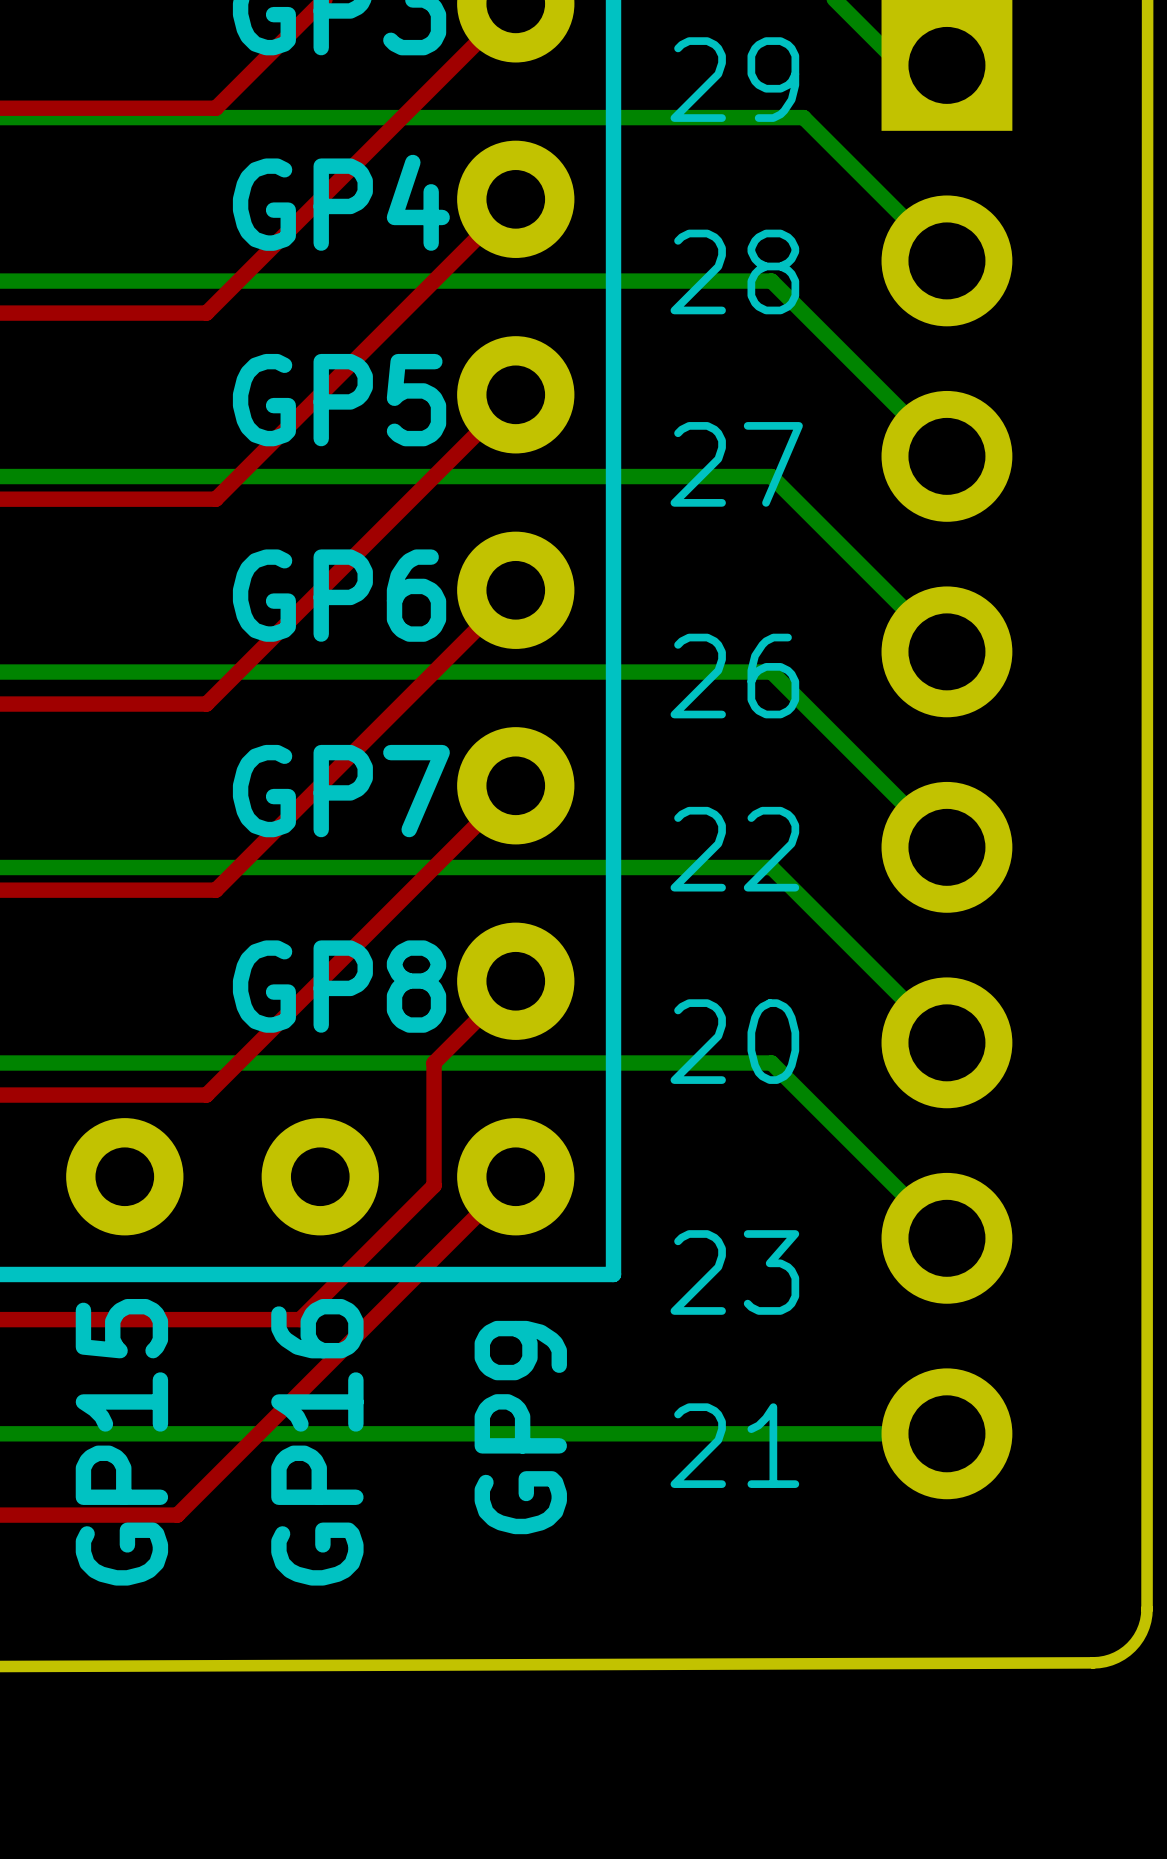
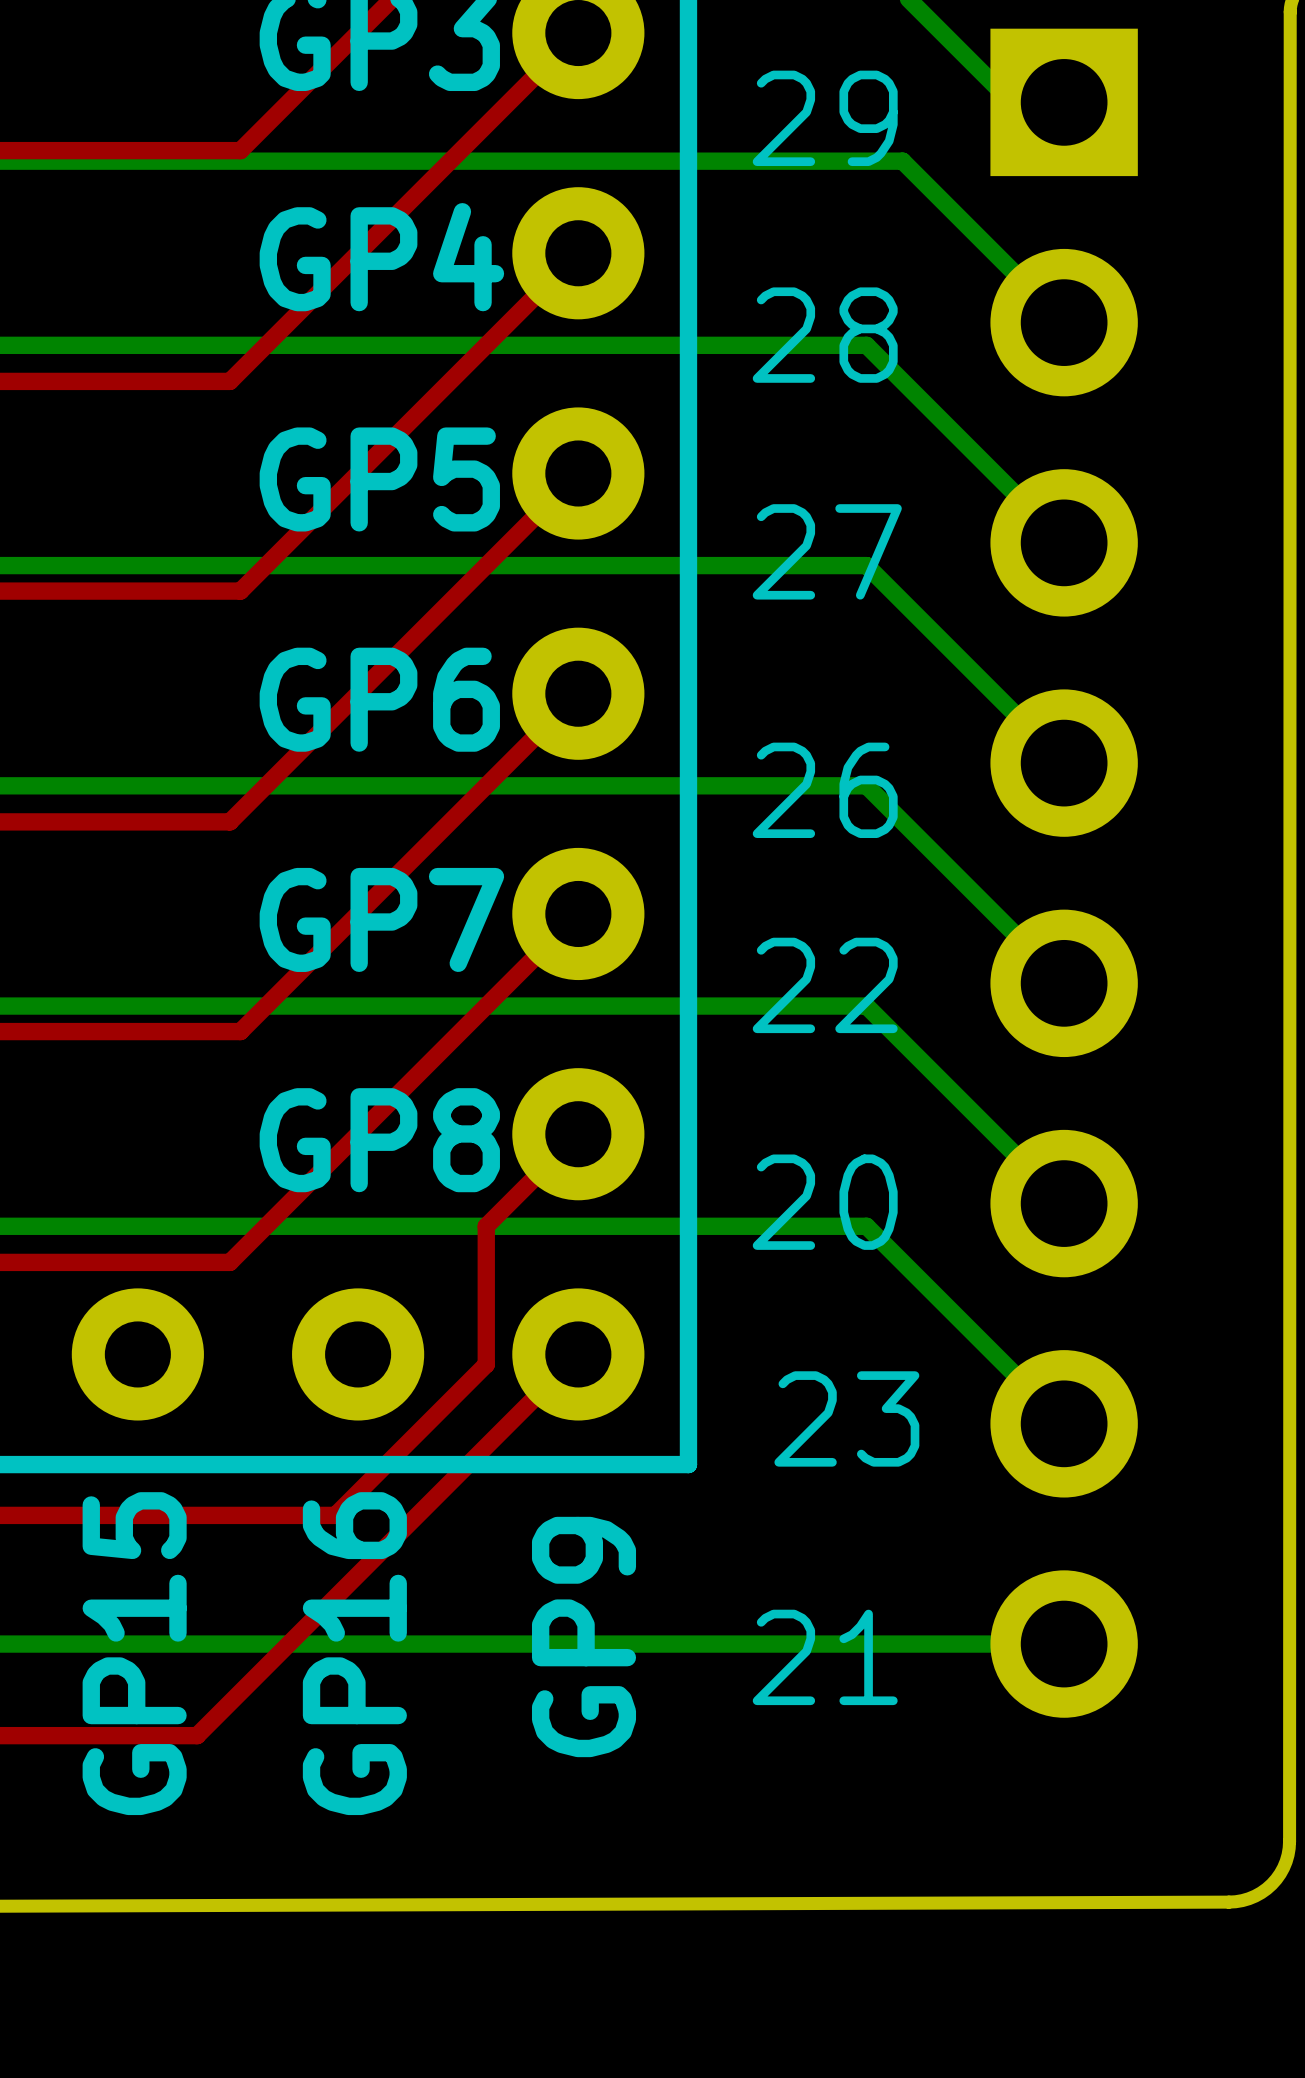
text position: 23 (734, 1272) -> 23 (846, 1418)

